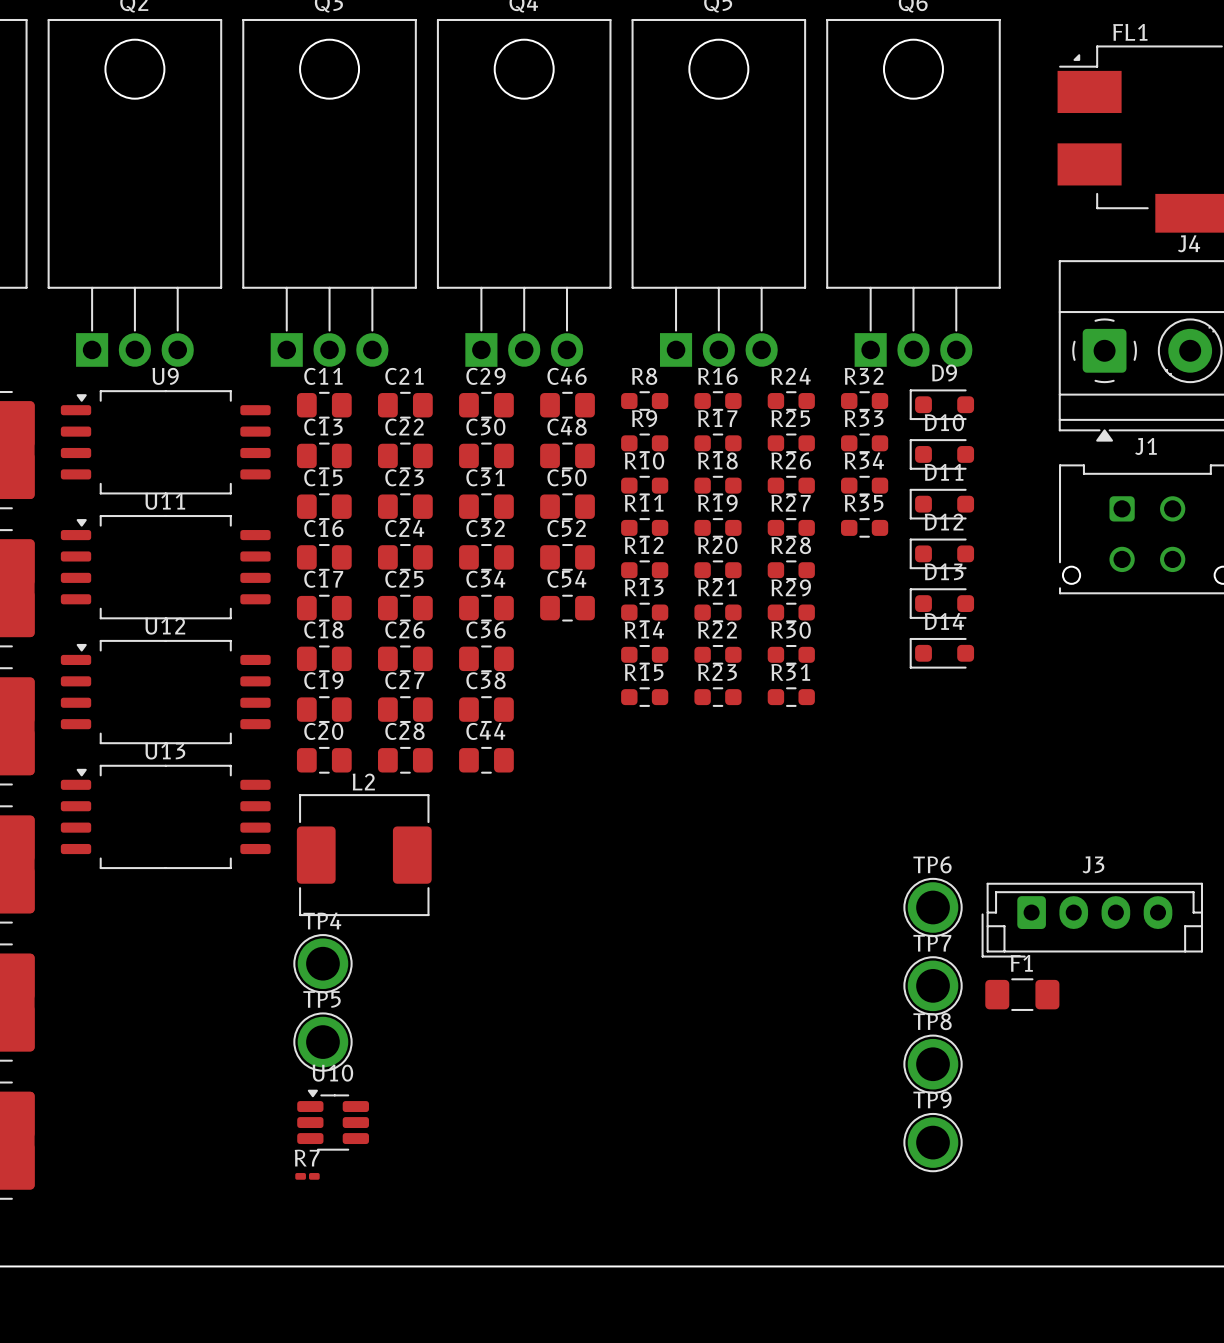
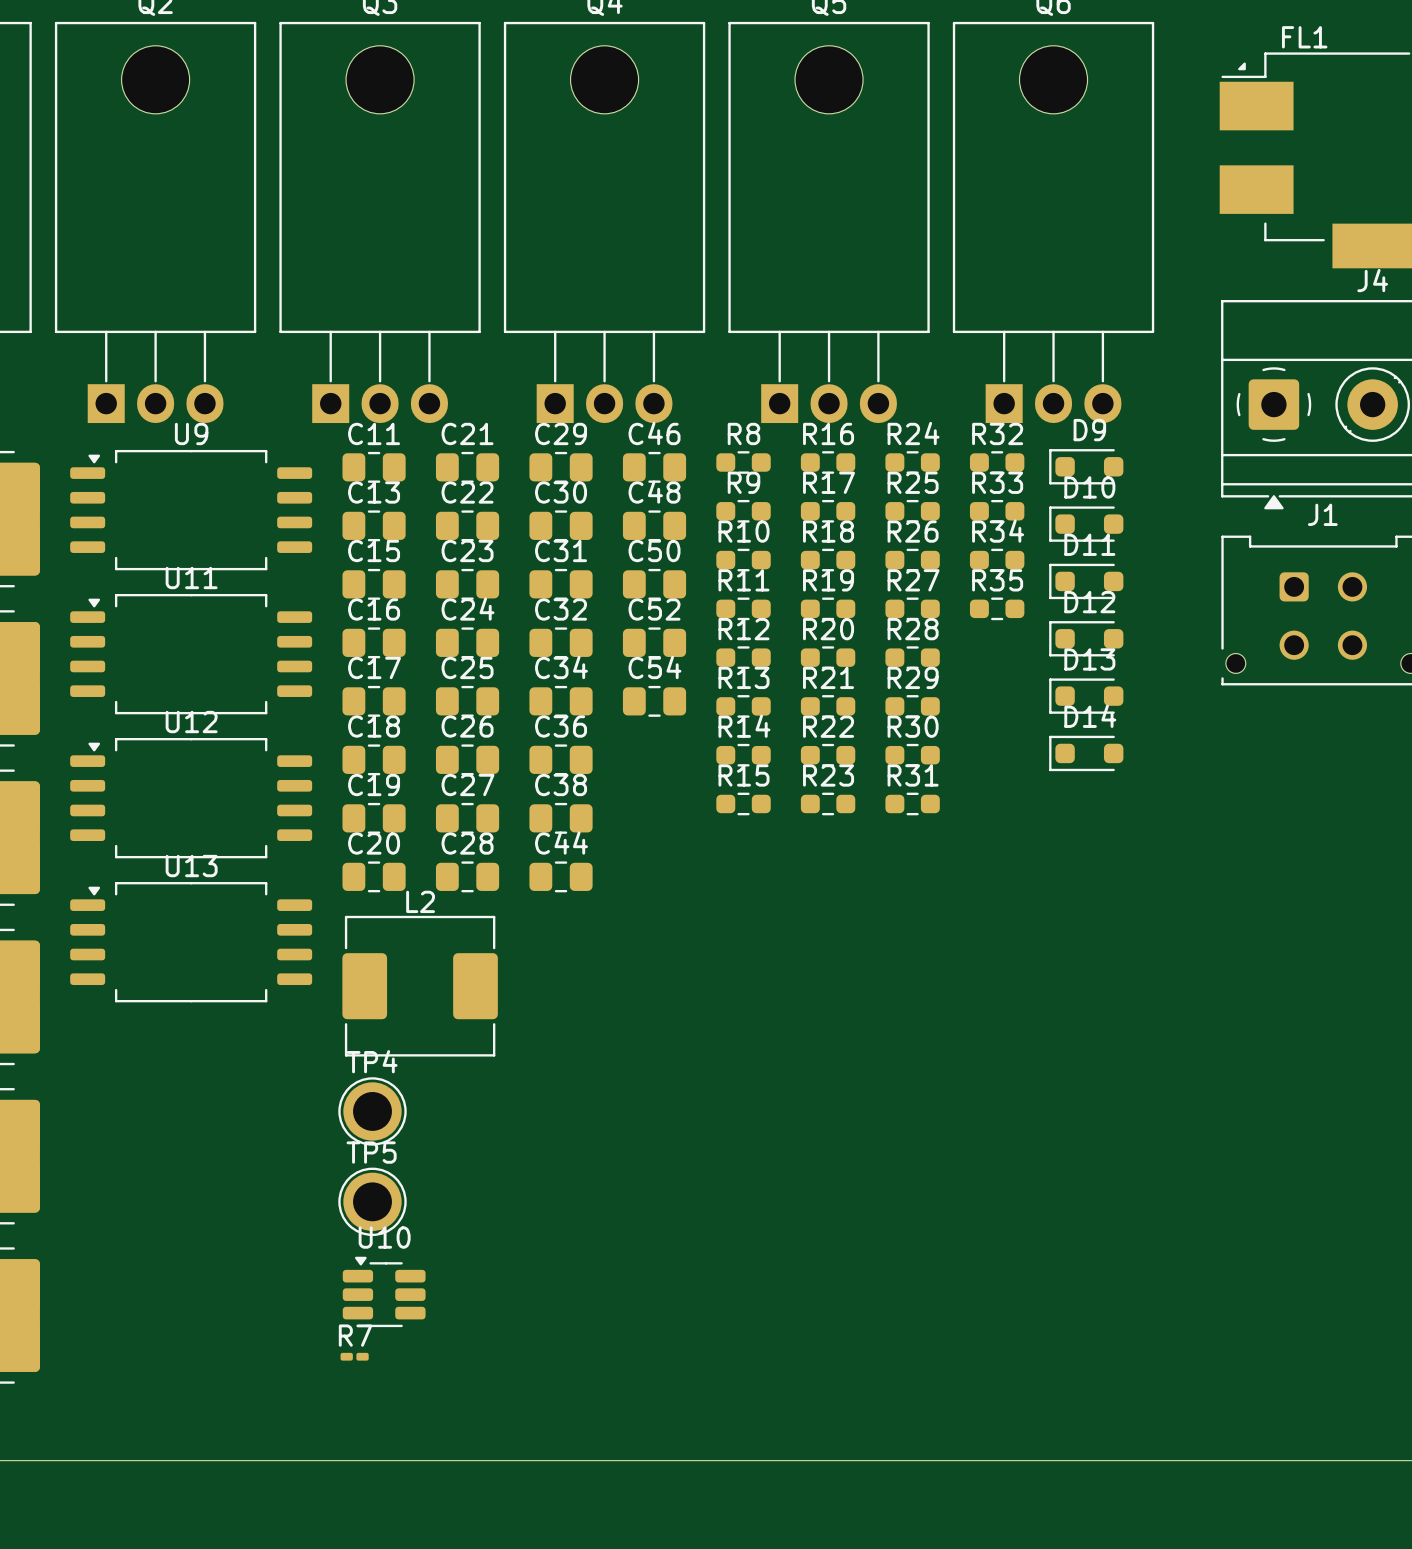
TP6: (933, 907) -> none
J3: (1092, 920) -> none
TP7: (933, 985) -> none
F1: (1022, 994) -> none
TP8: (933, 1064) -> none
TP9: (933, 1142) -> none

